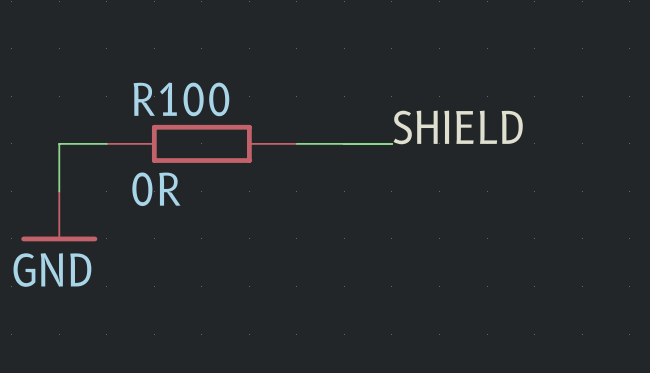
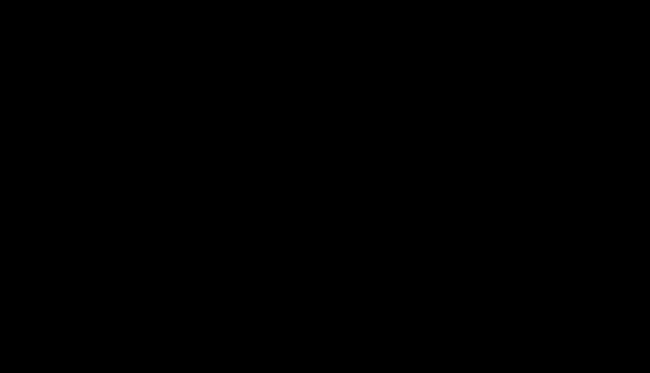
label: SHIELD (458, 127) -> none
wire: (106, 143) (59, 143) (59, 191) -> none
R100: 0R (201, 143) -> none
wire: (296, 143) (391, 143) -> none
power symbol: GND (59, 216) -> none

